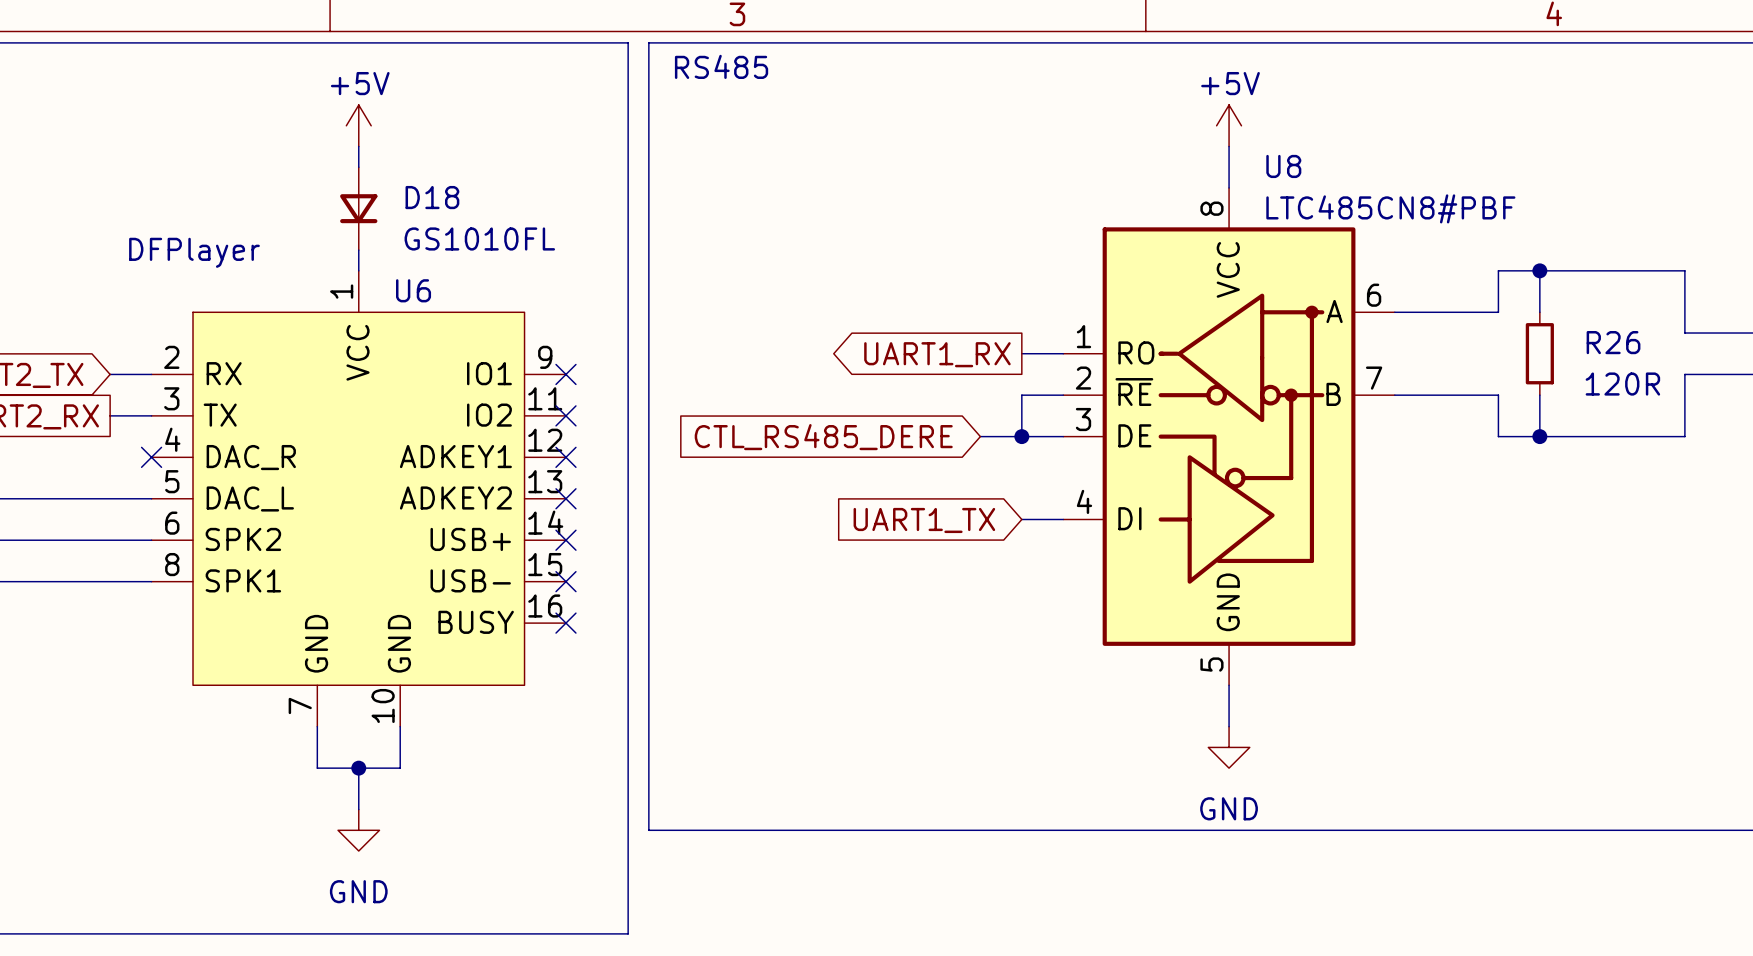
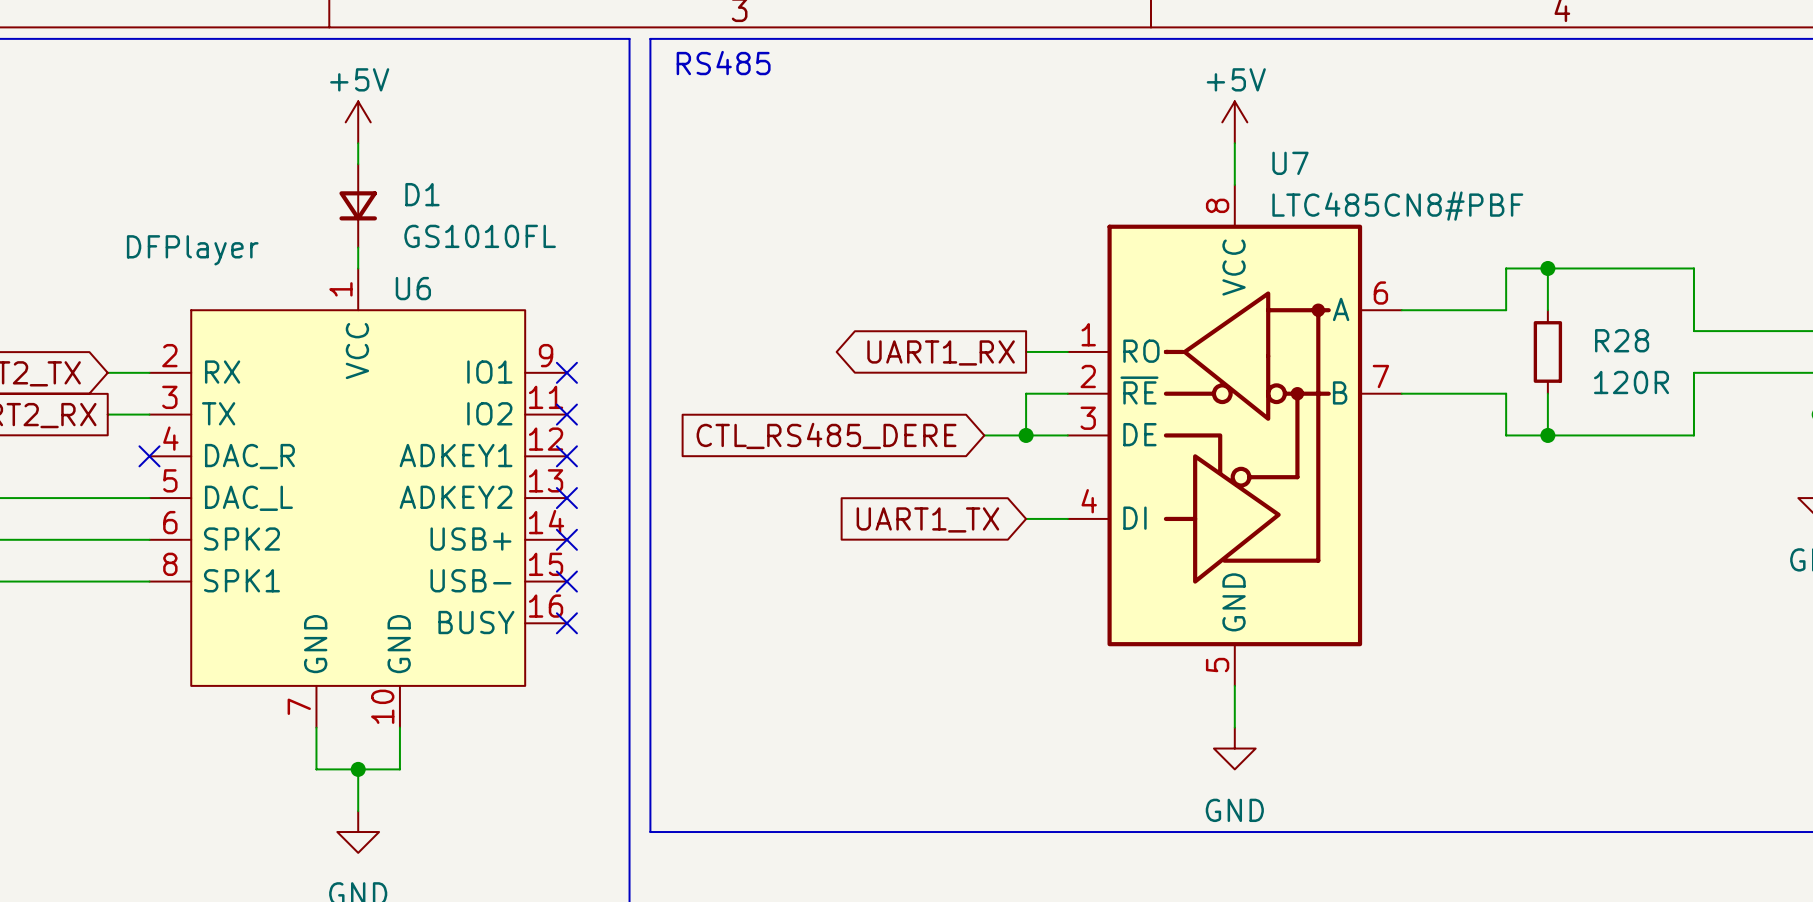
U8 name: U8 (1283, 166) -> U7 (1290, 163)
D18 name: D18 (432, 197) -> D1 (422, 194)
R26 name: R26 (1613, 342) -> R28 (1622, 340)

